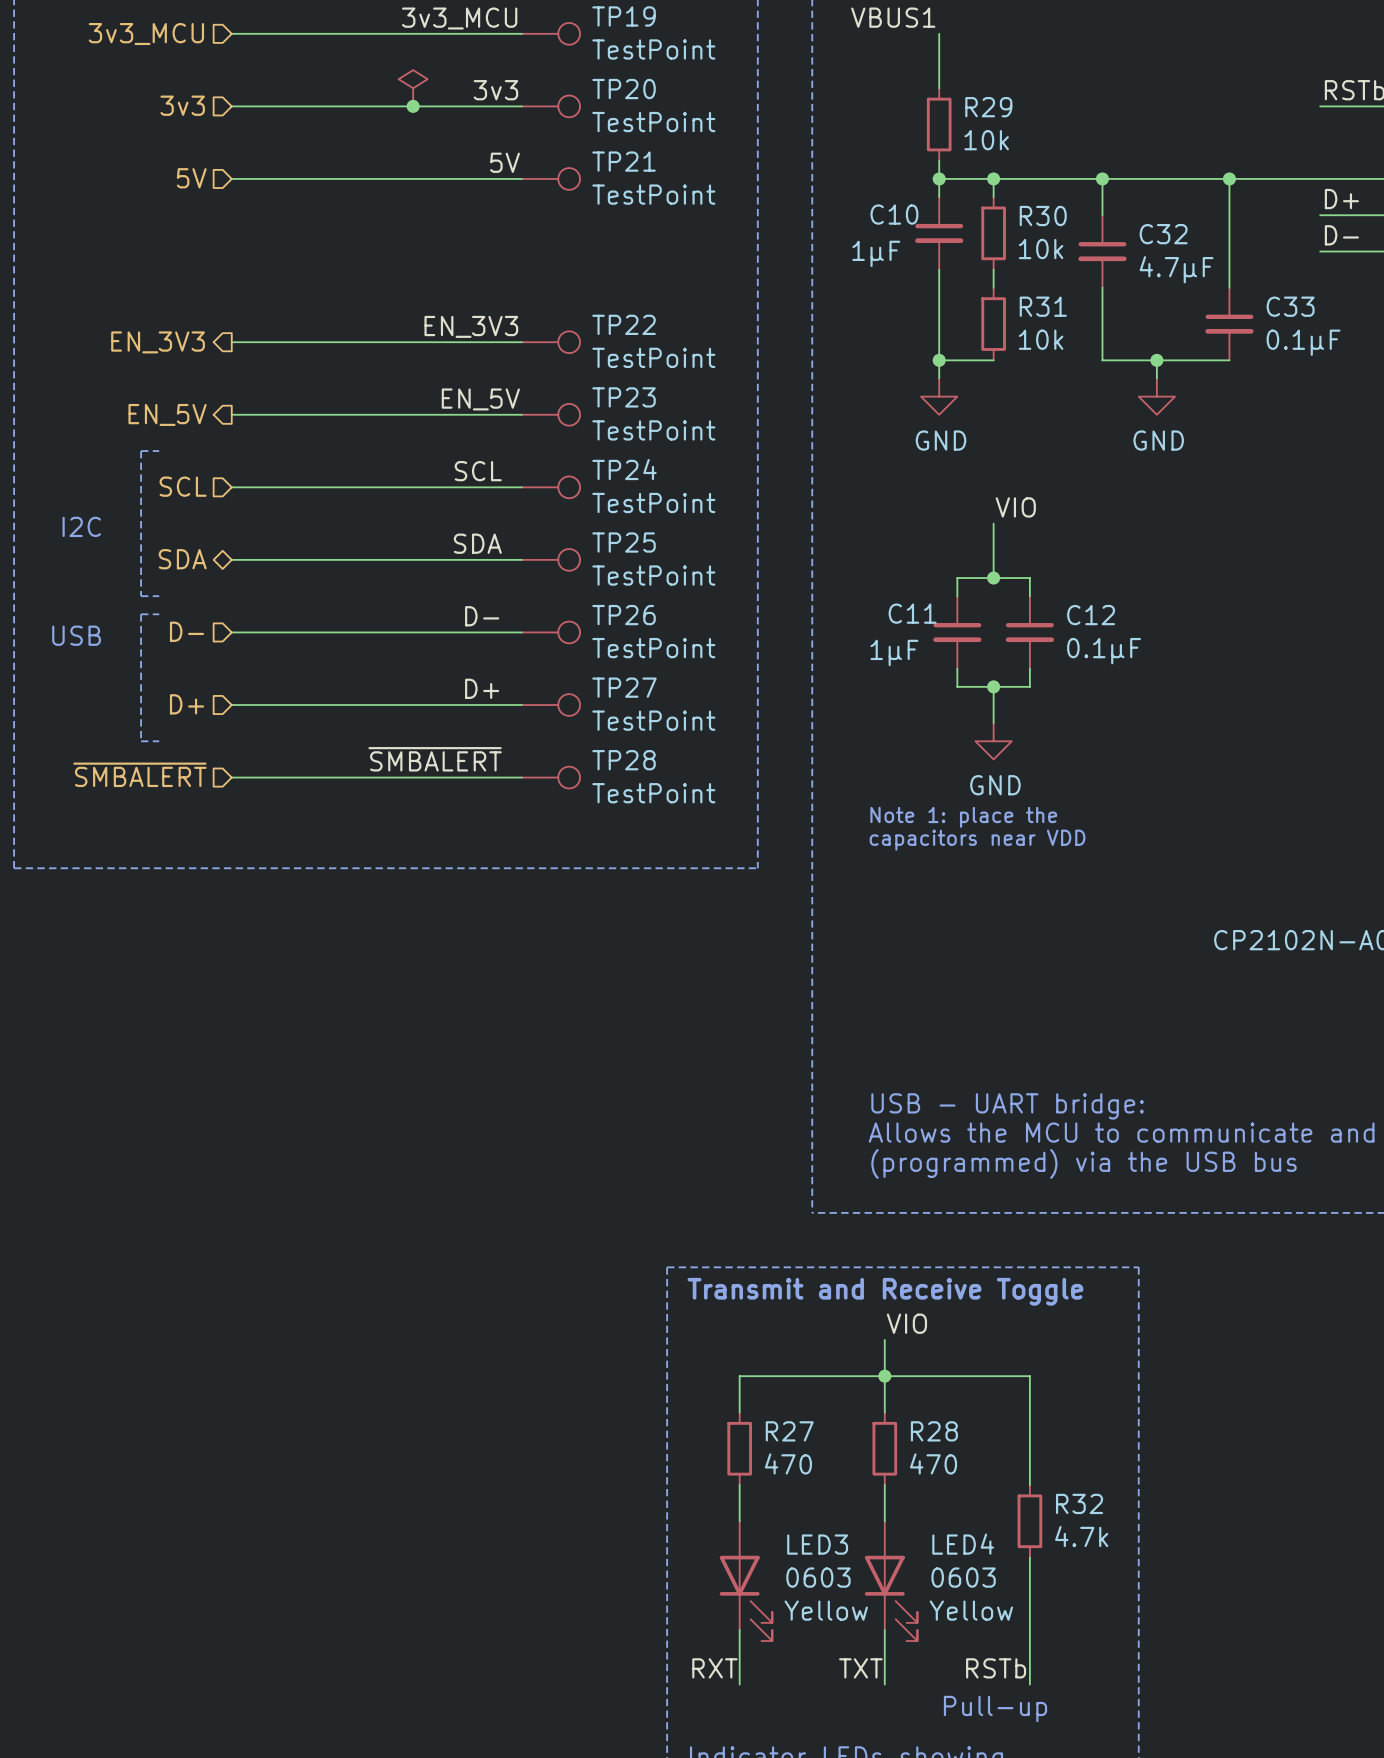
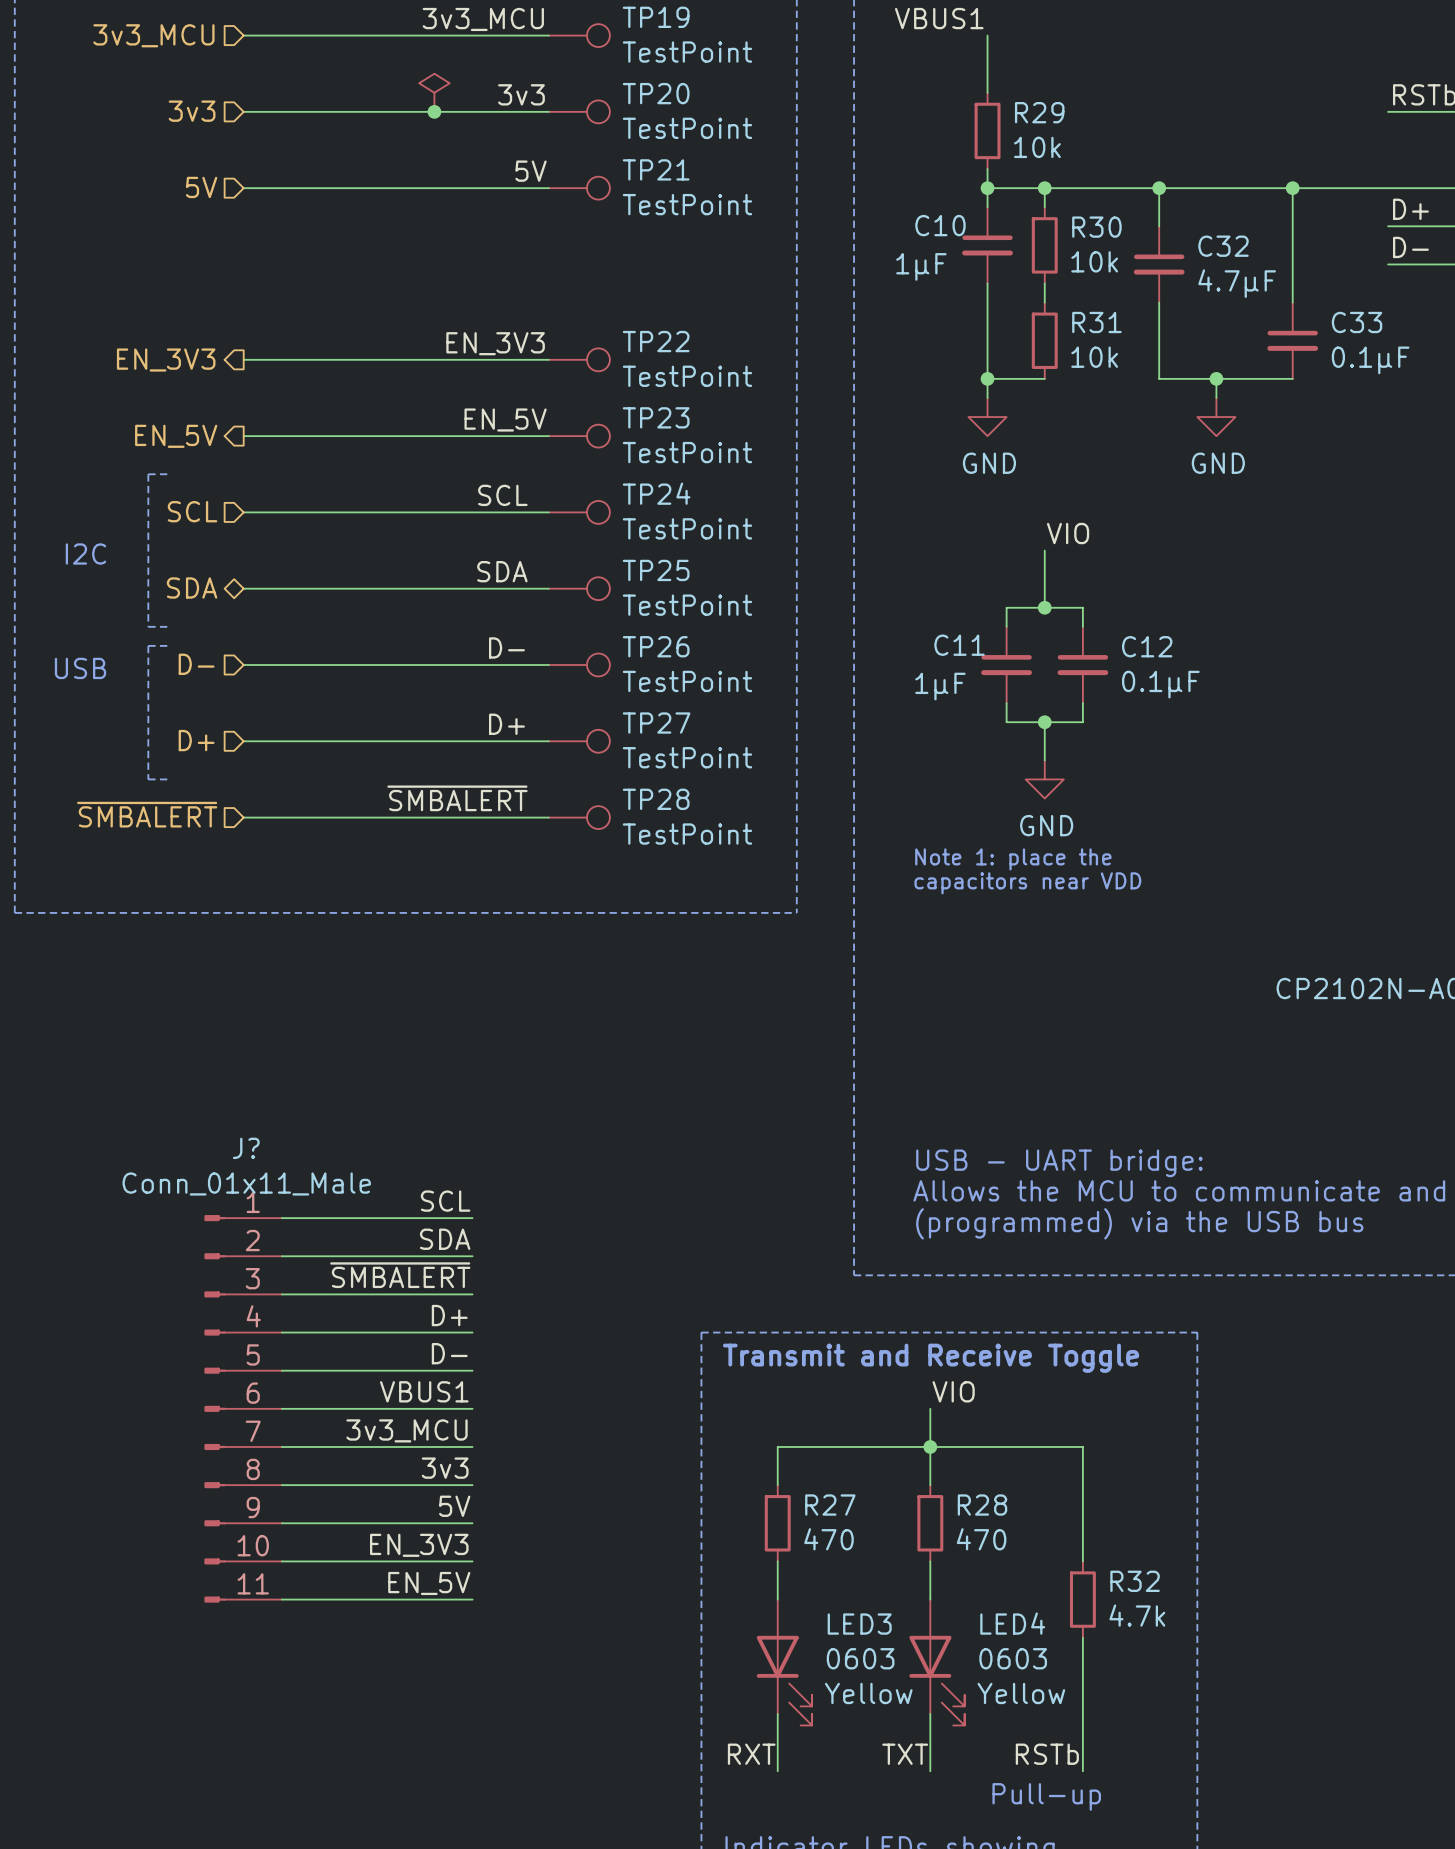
label: none -> SCL (445, 1201)
wire: none -> (281, 1218) (472, 1218)
label: none -> SDA (445, 1239)
wire: none -> (281, 1256) (472, 1256)
label: none -> ~{SMBALERT} (400, 1275)
wire: none -> (281, 1294) (472, 1294)
label: none -> D+ (449, 1315)
wire: none -> (281, 1332) (472, 1332)
label: none -> D- (449, 1353)
wire: none -> (281, 1370) (472, 1370)
label: none -> VBUS1 (424, 1391)
J?: none -> Conn_01x11_Male (243, 1408)
wire: none -> (281, 1408) (472, 1408)
label: none -> 3v3_MCU (407, 1430)
wire: none -> (281, 1446) (472, 1446)
label: none -> 3v3 (445, 1468)
wire: none -> (281, 1485) (472, 1485)
label: none -> 5V (454, 1506)
wire: none -> (281, 1523) (472, 1523)
label: none -> EN_3V3 (419, 1545)
wire: none -> (281, 1561) (472, 1561)
label: none -> EN_5V (429, 1583)
wire: none -> (281, 1599) (472, 1599)

